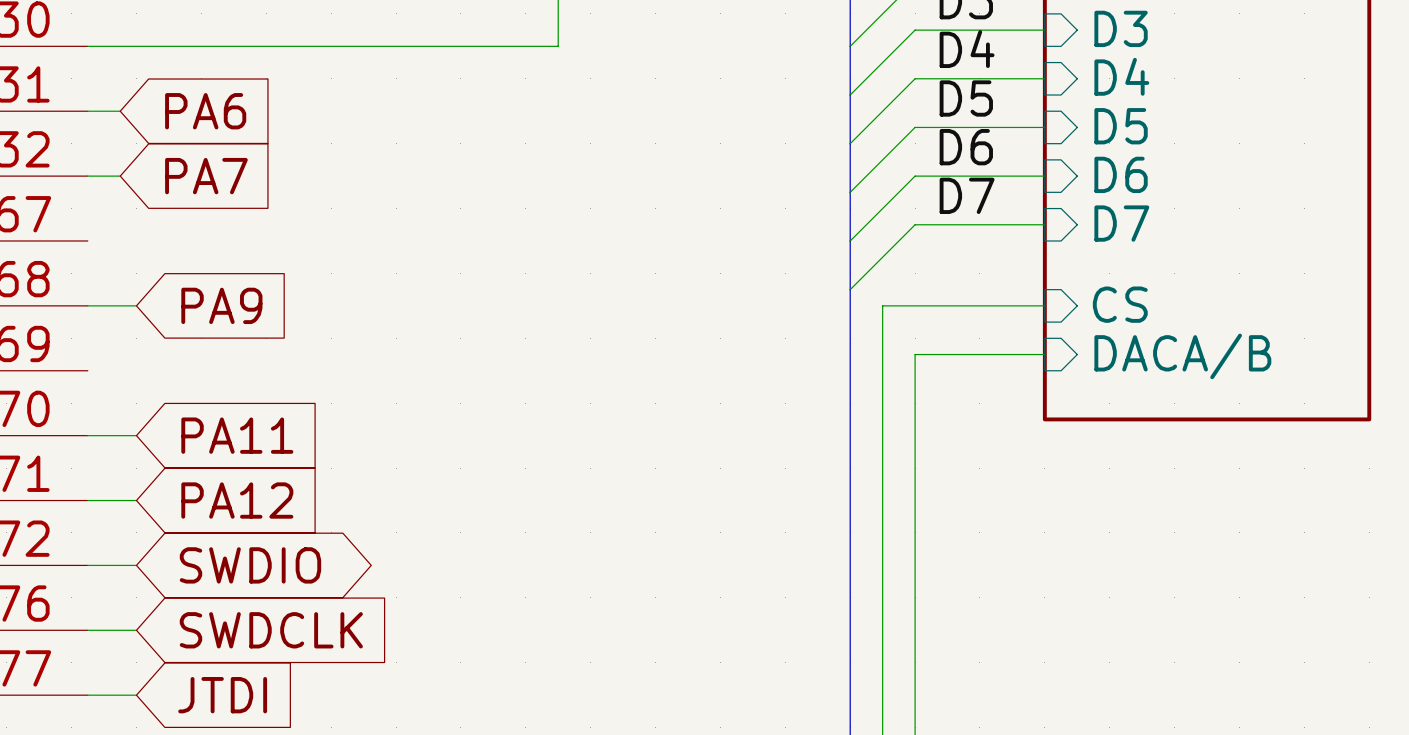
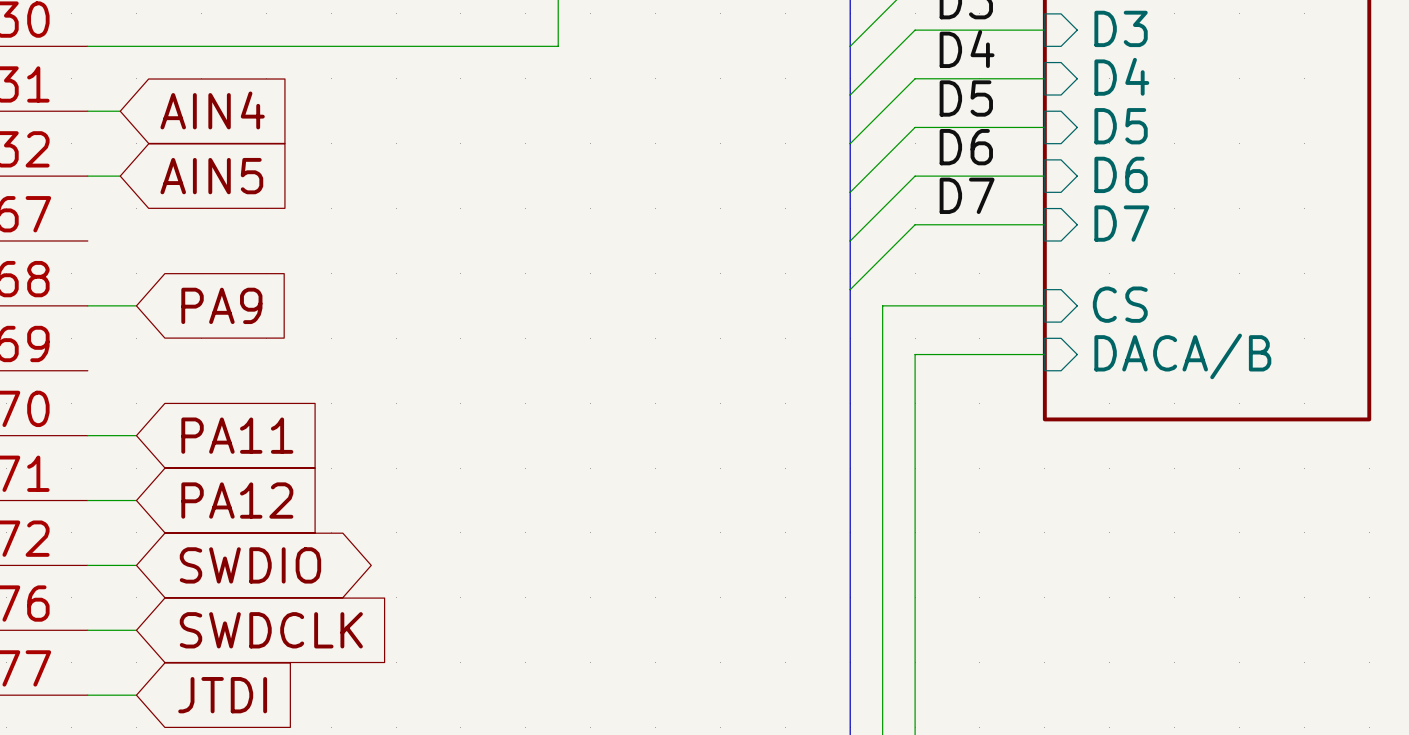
global label: PA6 (205, 111) -> AIN4 (212, 110)
global label: PA7 (206, 176) -> AIN5 (211, 176)

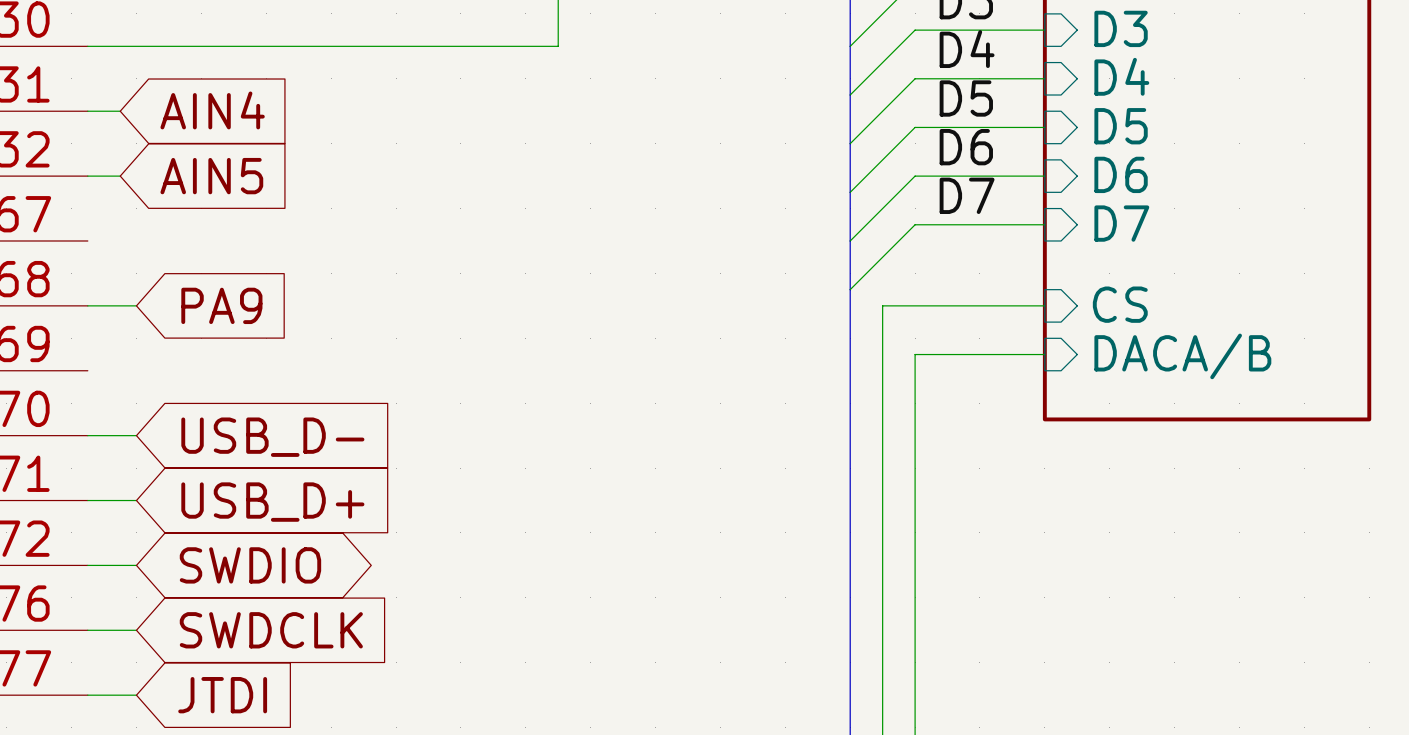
global label: PA11 (237, 435) -> USB_D- (272, 437)
global label: PA12 (237, 500) -> USB_D+ (272, 502)

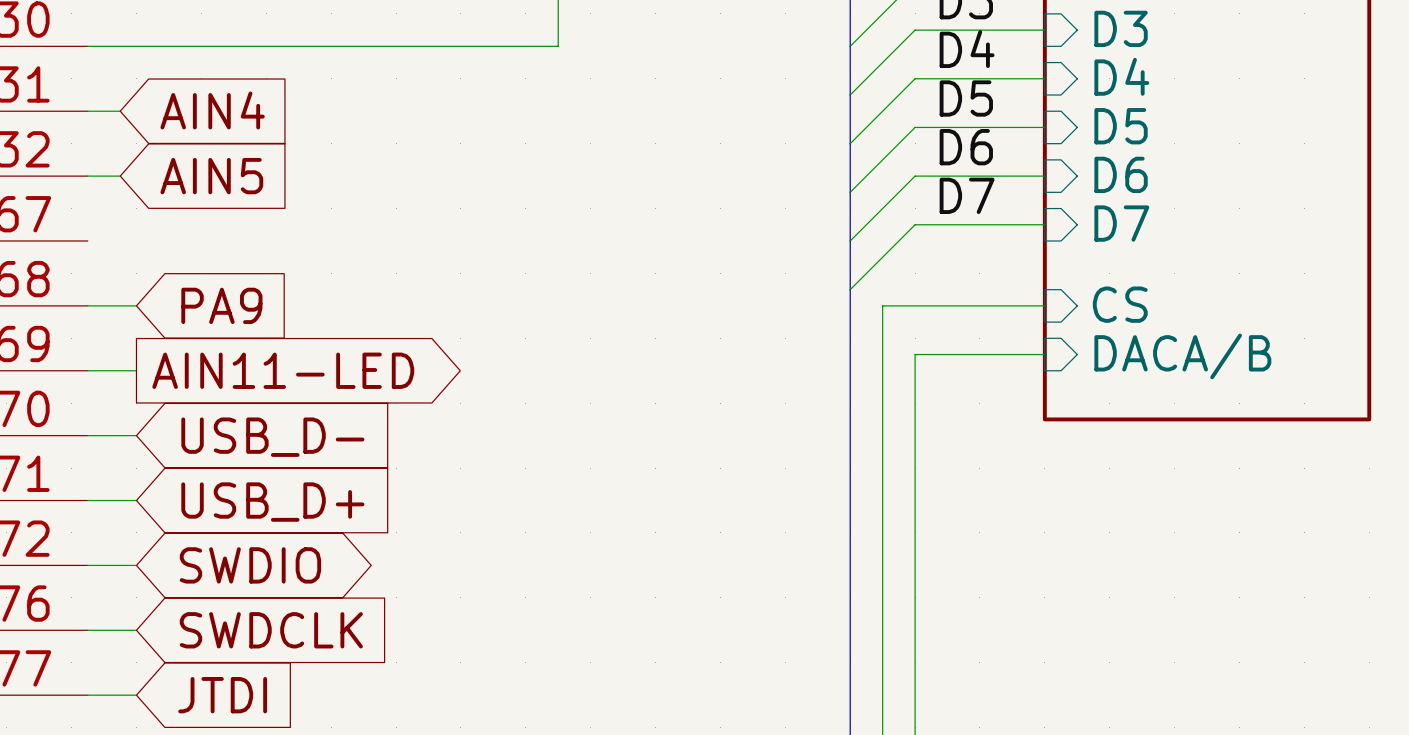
wire: none -> (87, 370) (136, 370)
global label: none -> AIN11-LED (283, 370)

